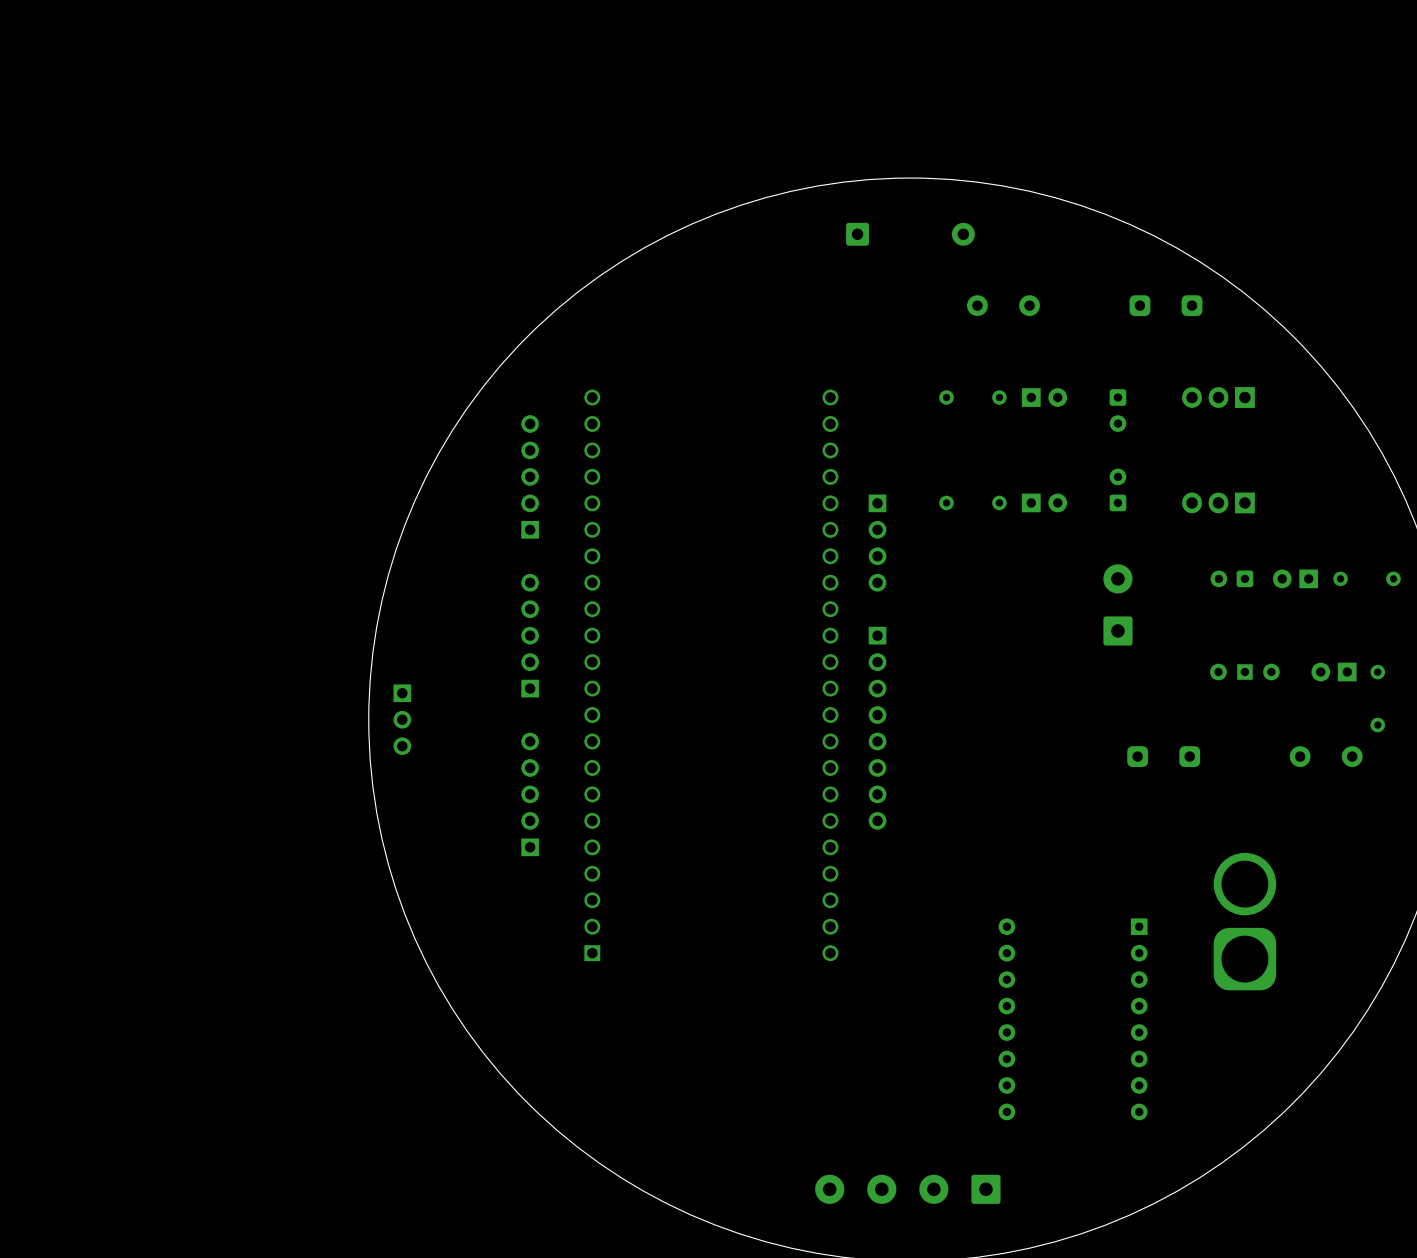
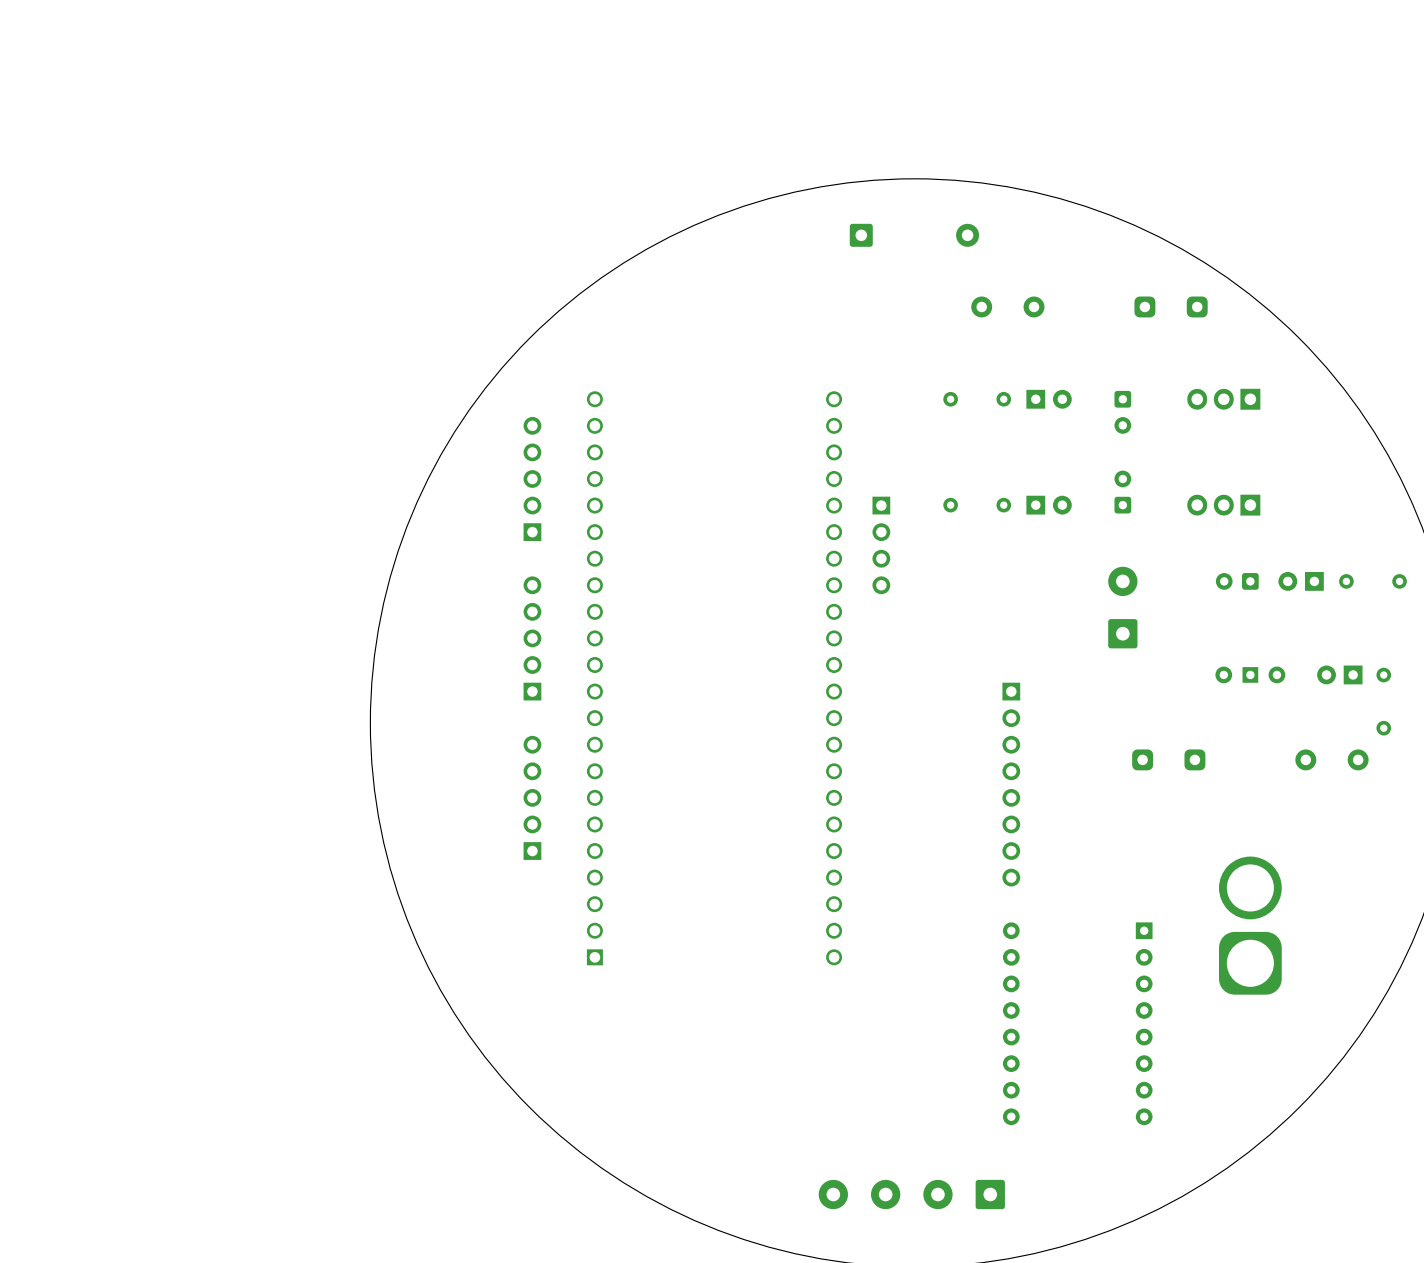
part: (402, 719) -> none
part position: (877, 728) -> (1011, 784)

